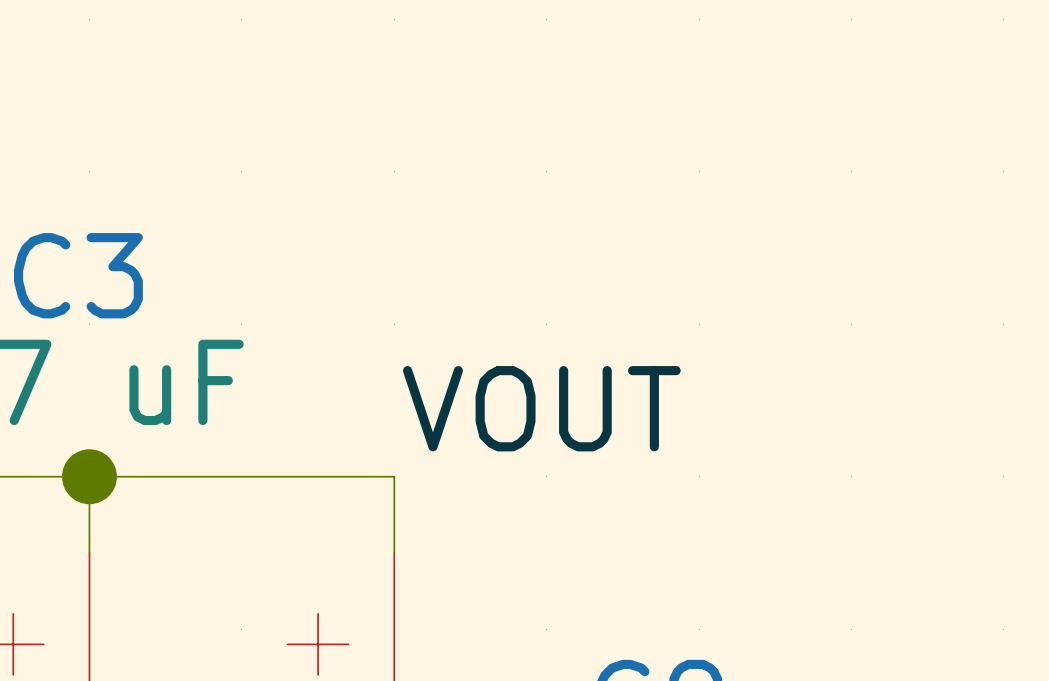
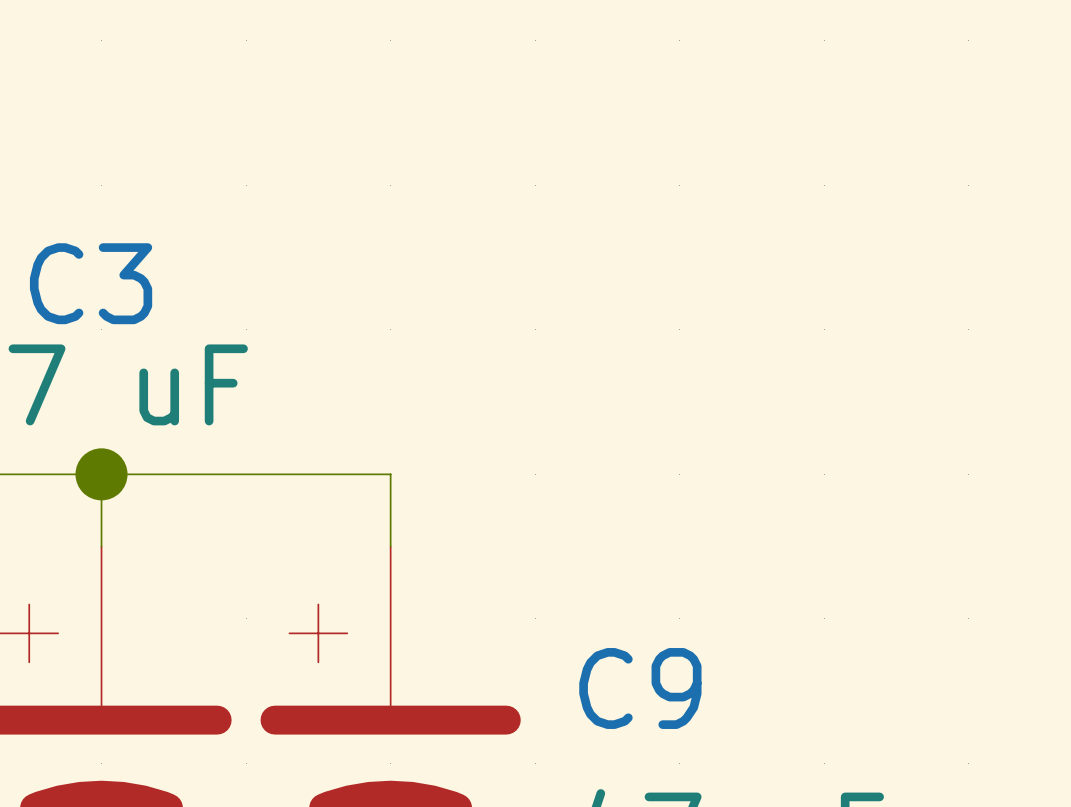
label: VOUT (541, 408) -> none

